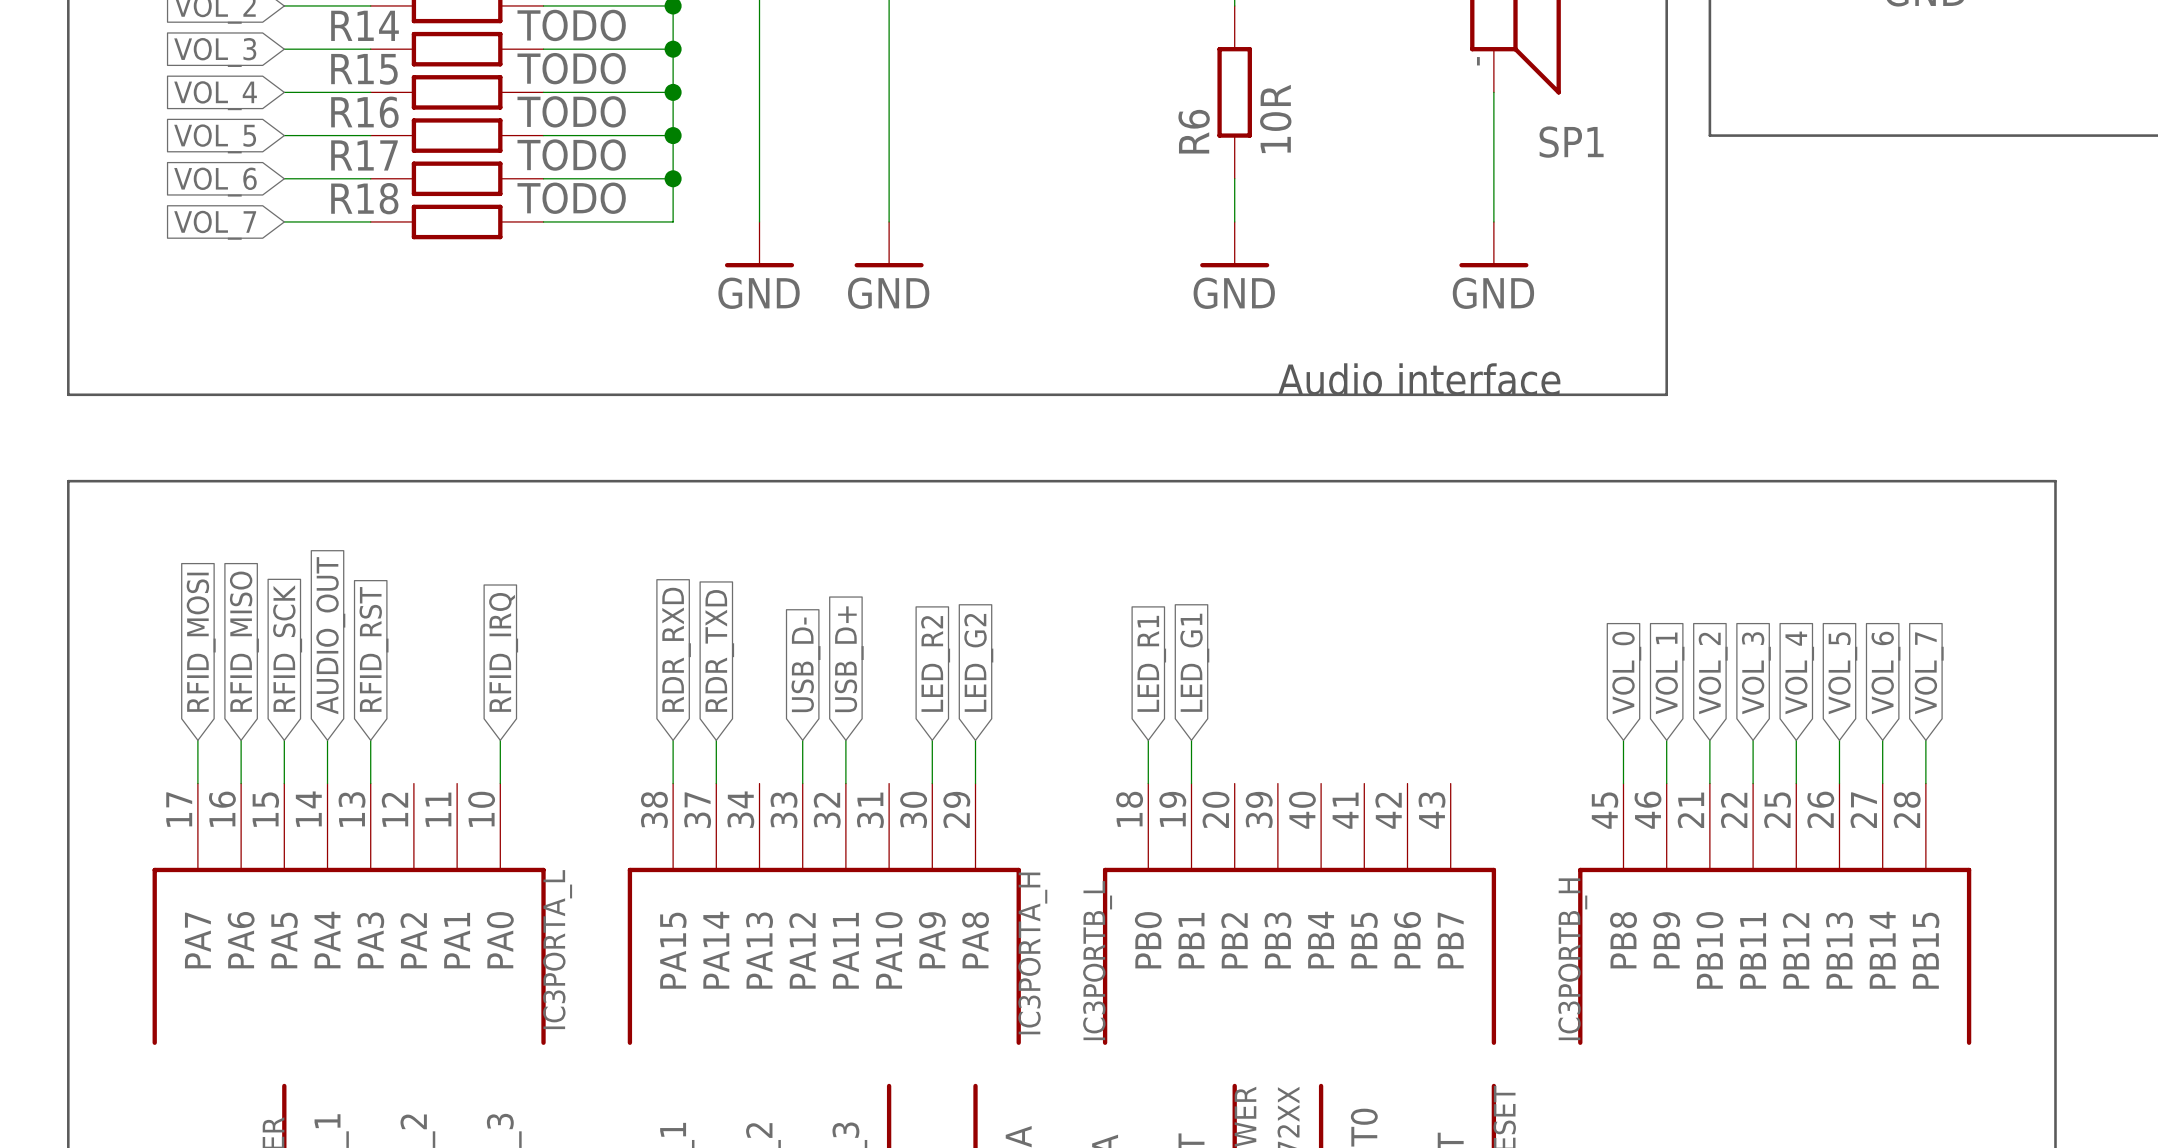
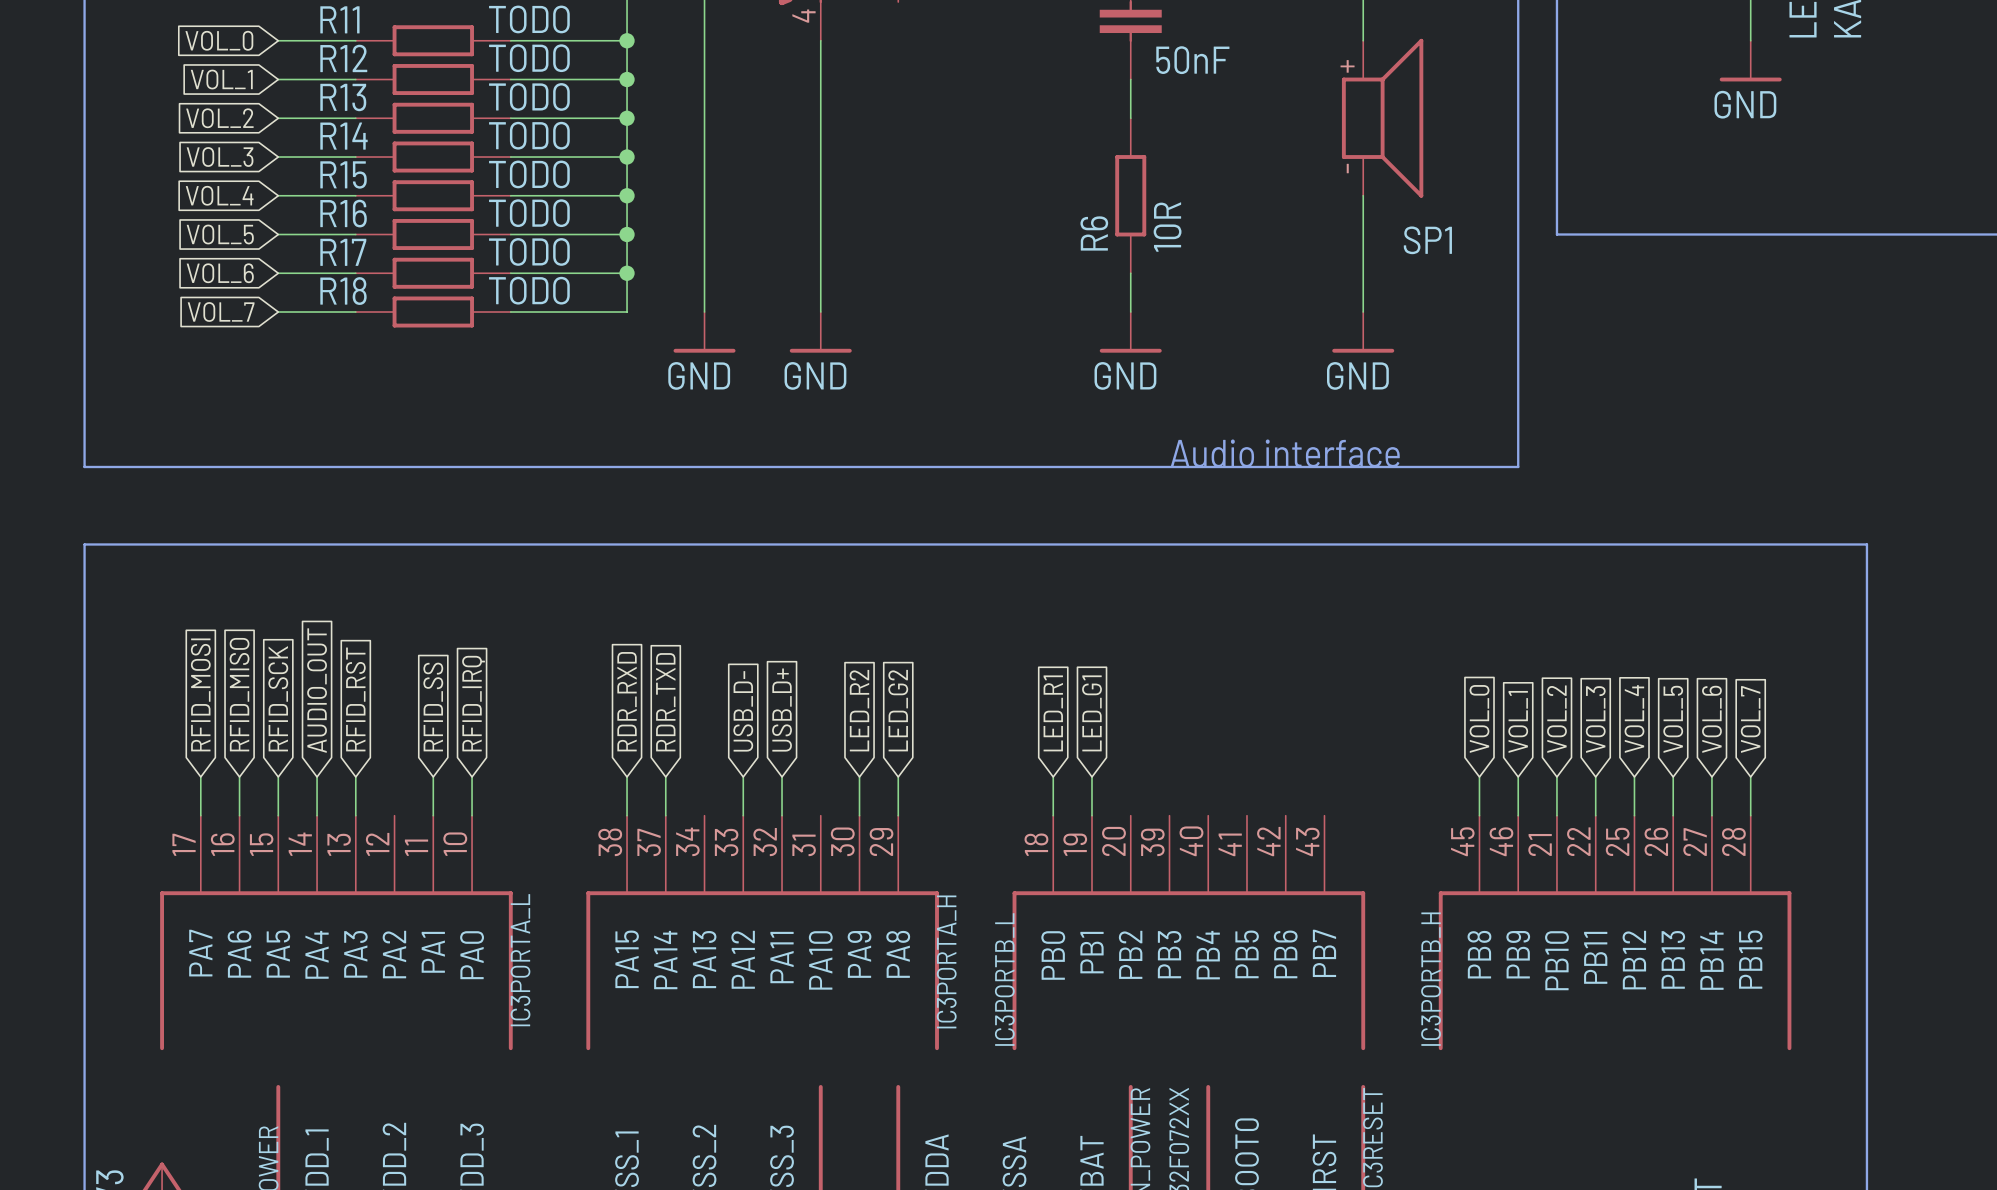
global label: none -> RFID_SS (433, 707)
wire: none -> (433, 776) (433, 815)

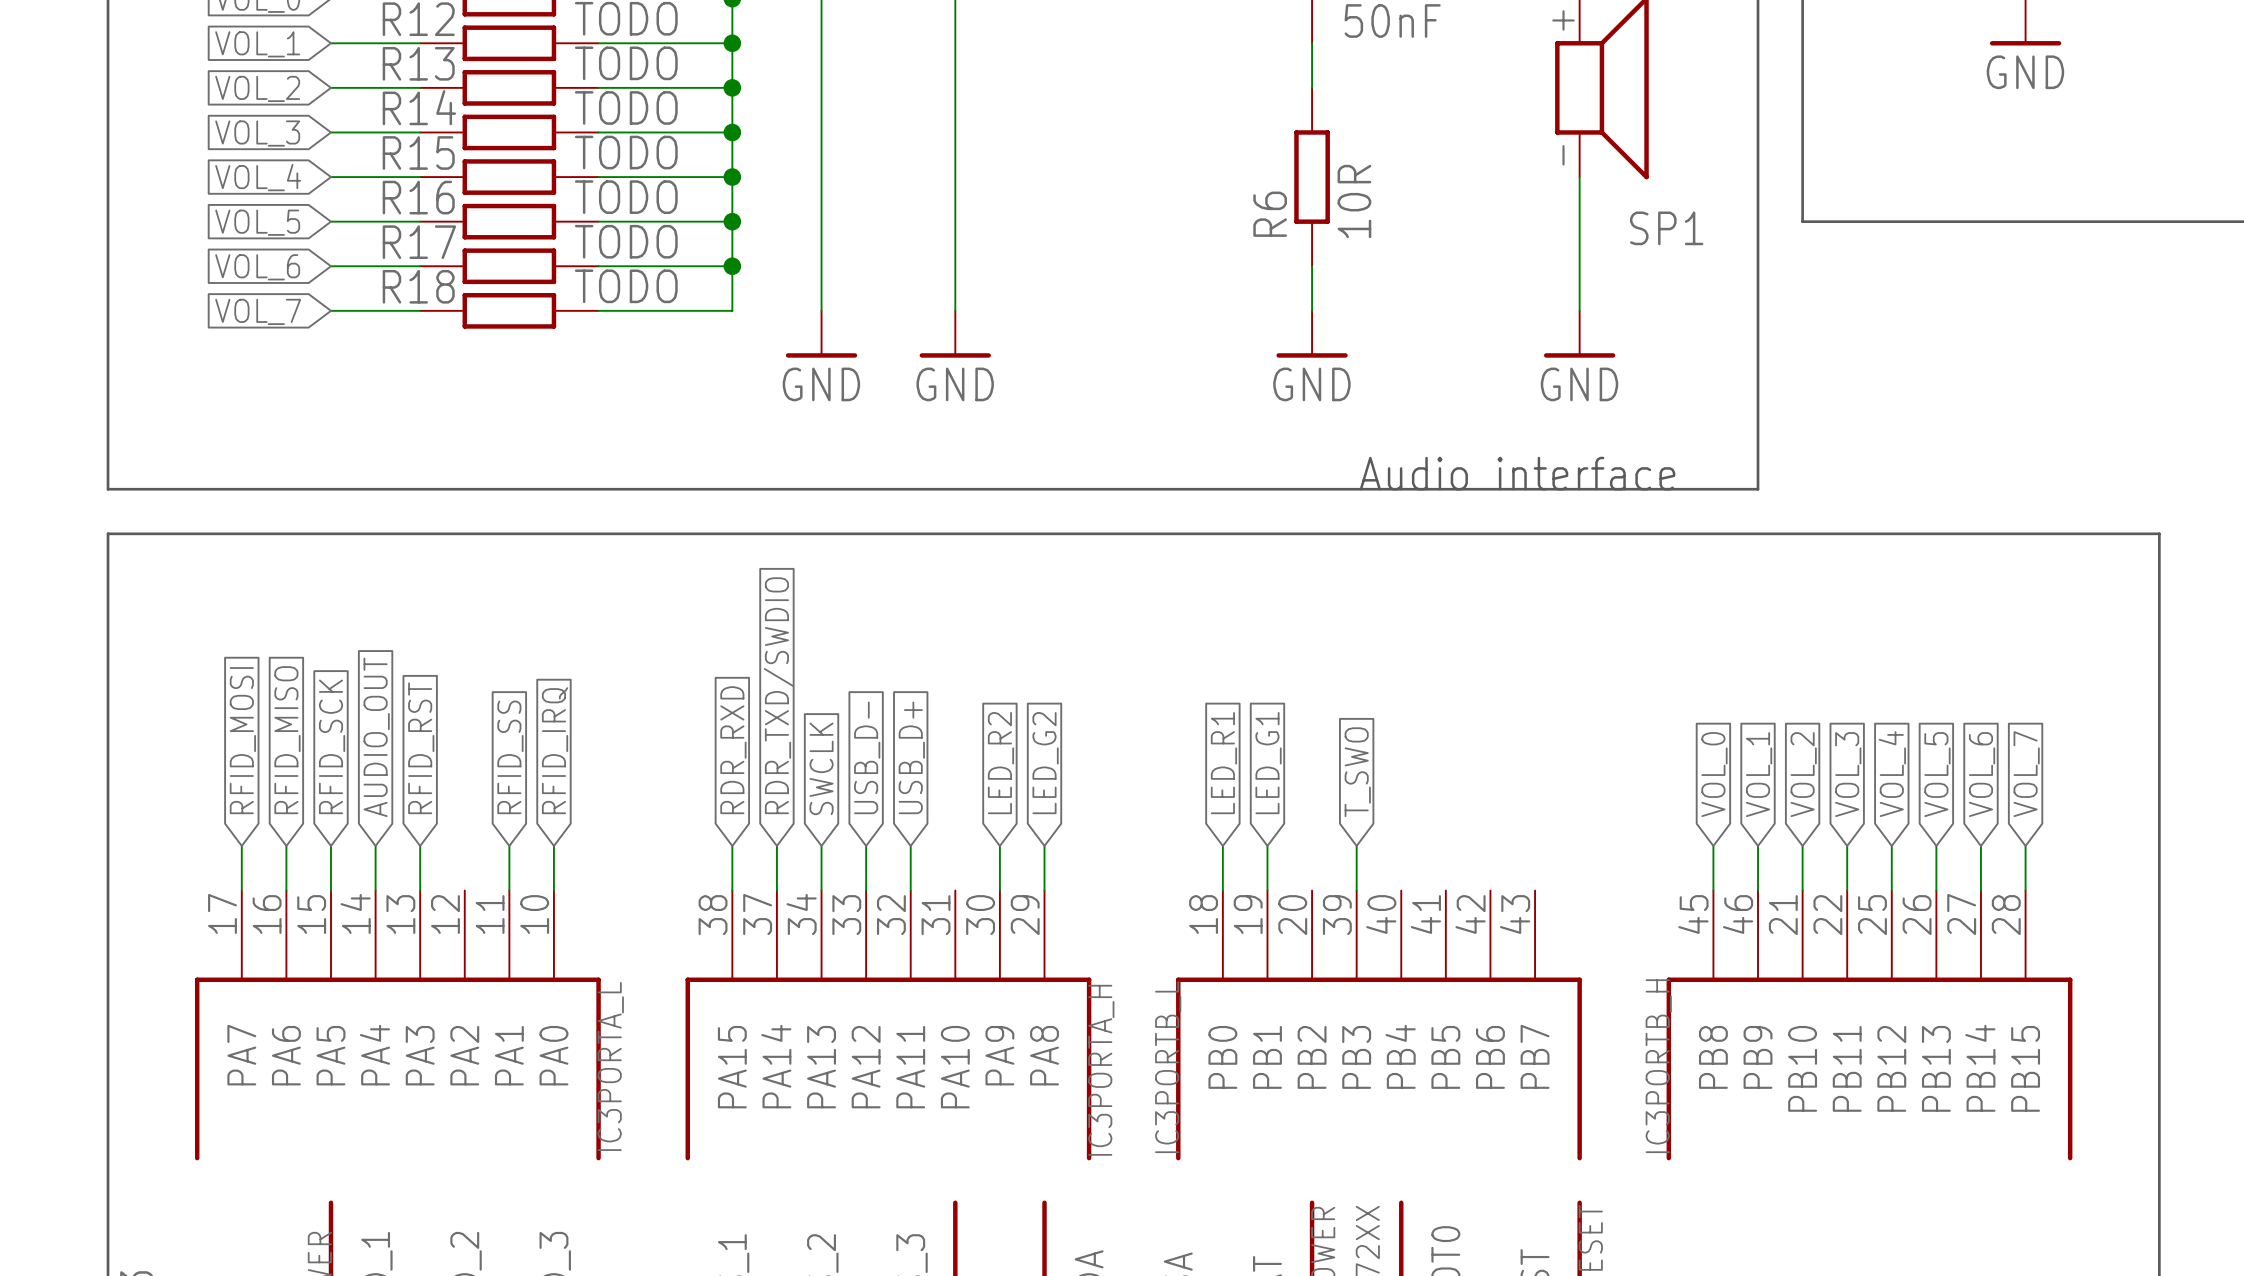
line: (84, 544) (1866, 544) -> (108, 578) (108, 533) (2159, 533) (2159, 578)
global label: RDR_TXD (665, 702) -> RDR_TXD/SWDIO (779, 695)
global label: none -> SWCLK (821, 768)
global label: none -> T_SWO (1357, 772)
wire: none -> (821, 845) (821, 890)
wire: none -> (1356, 845) (1356, 890)

